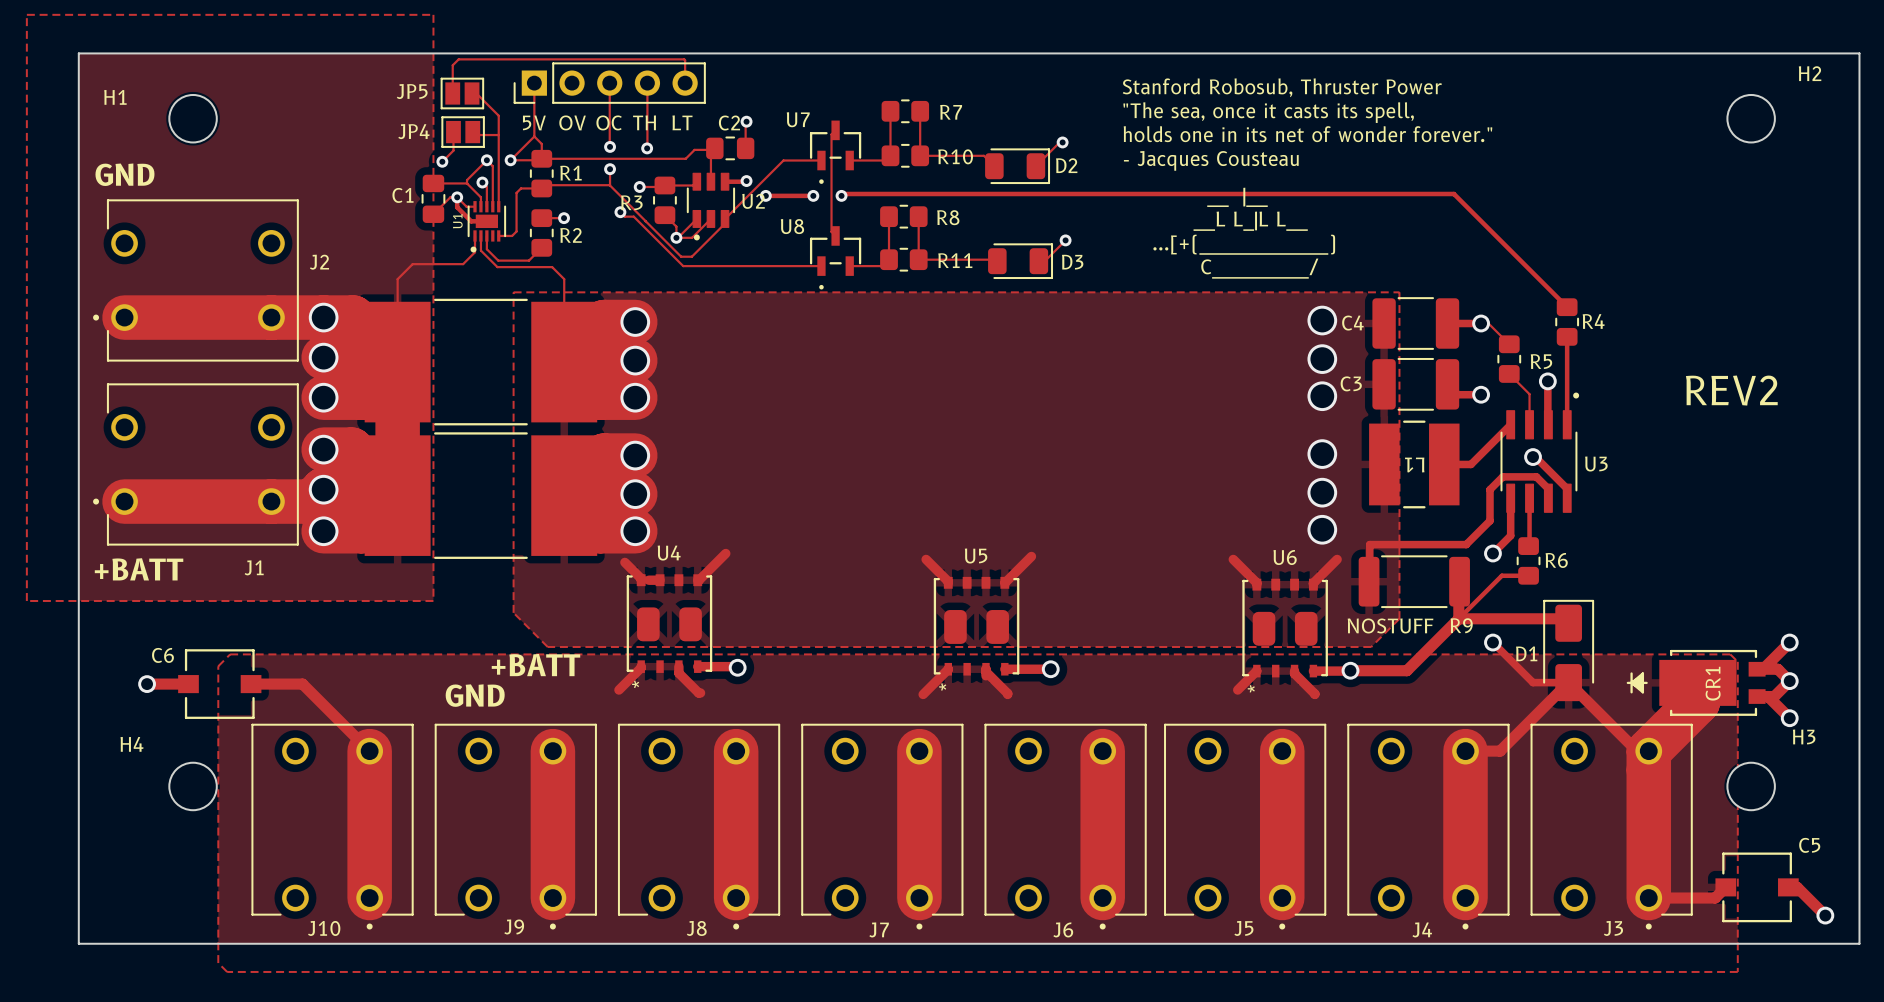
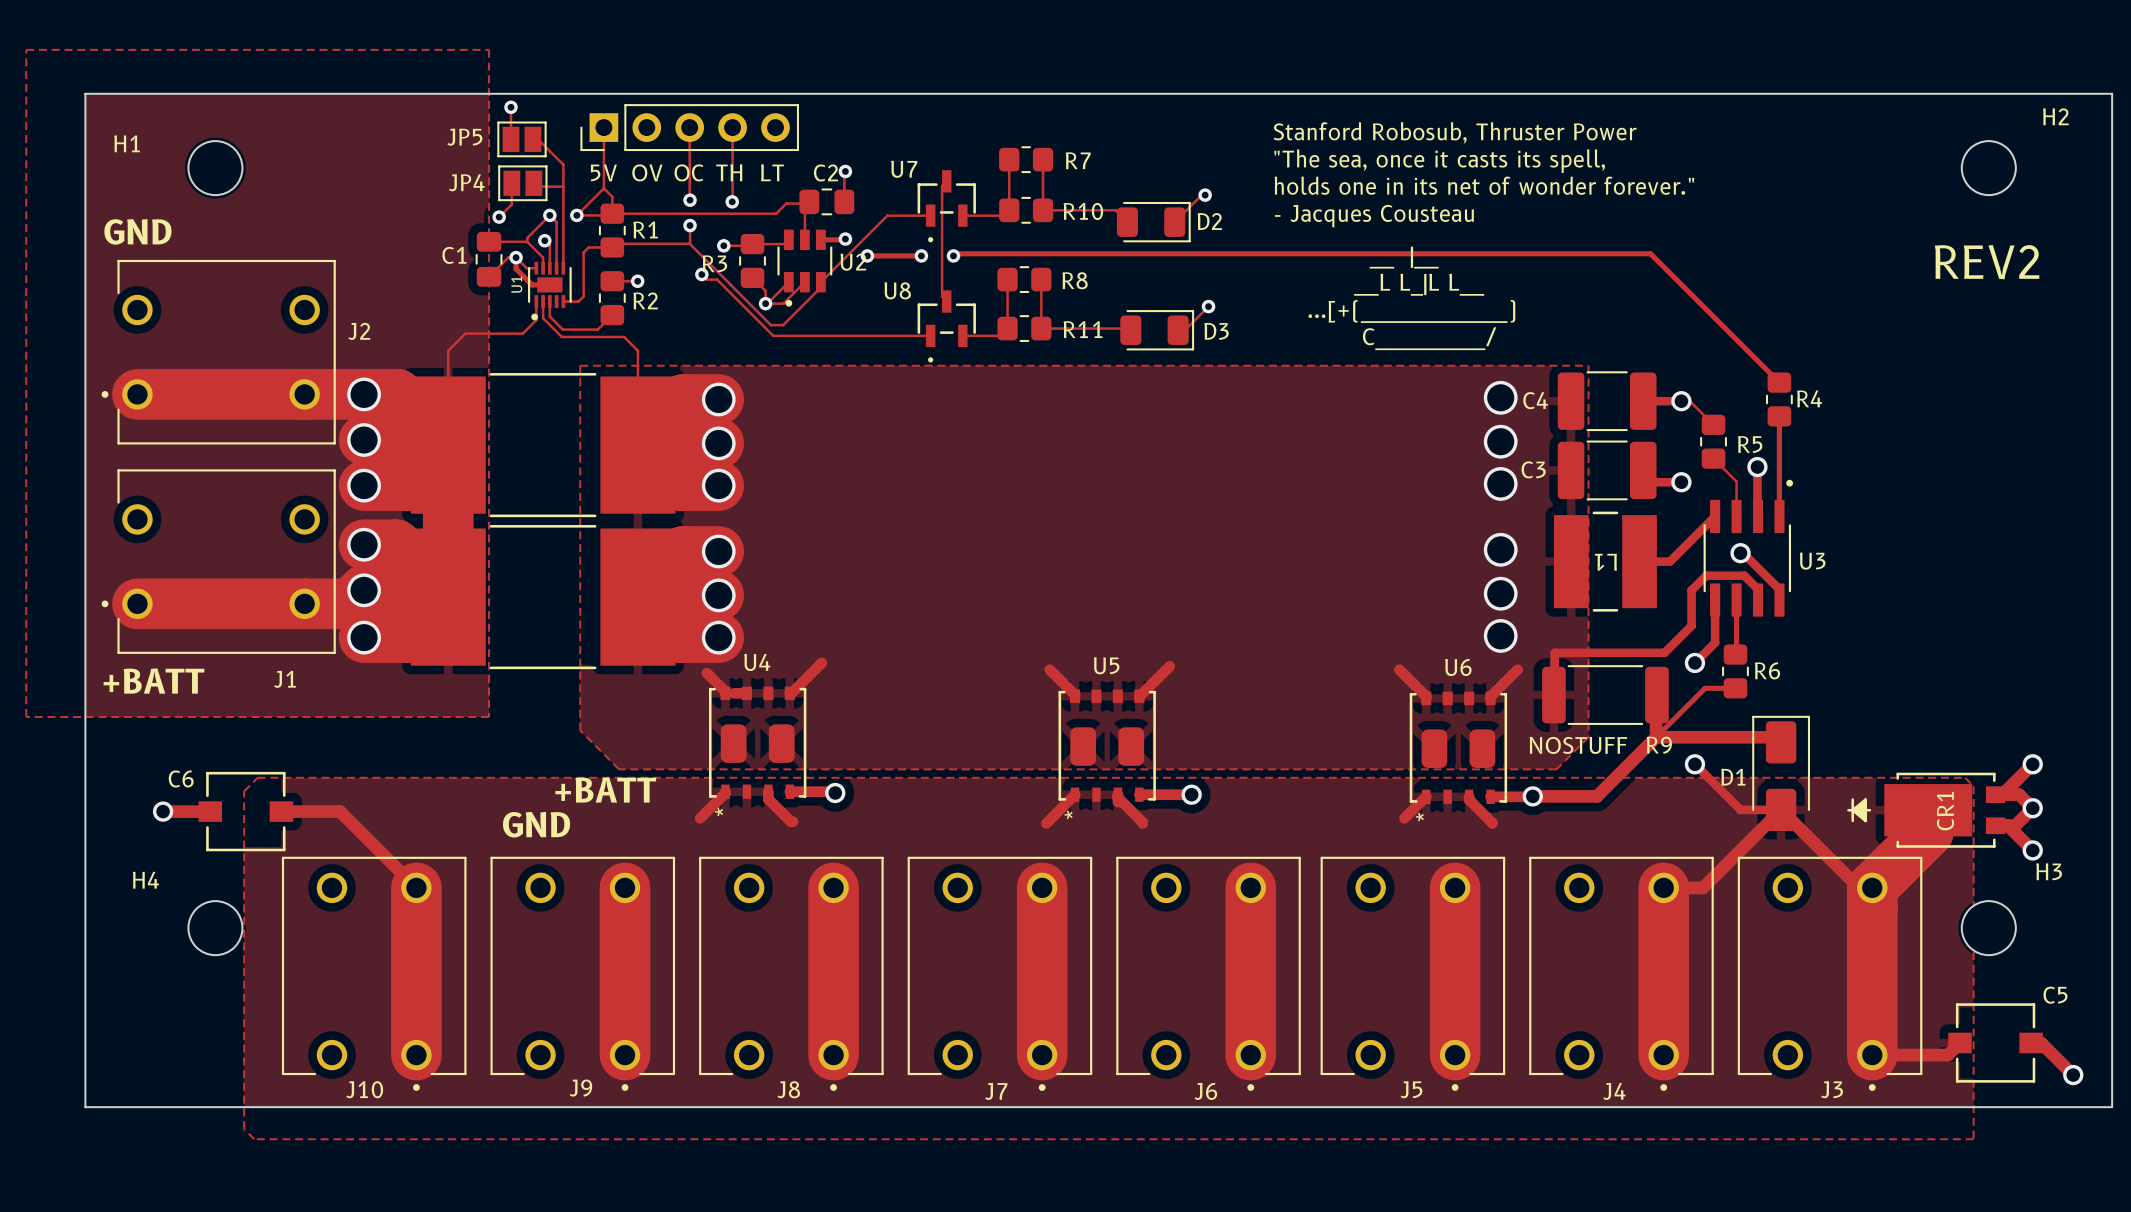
track: (452, 65) (458, 59) (684, 59) (685, 83) -> none
via: none -> (511, 107)
text position: REV2 (1731, 390) -> REV2 (1987, 262)

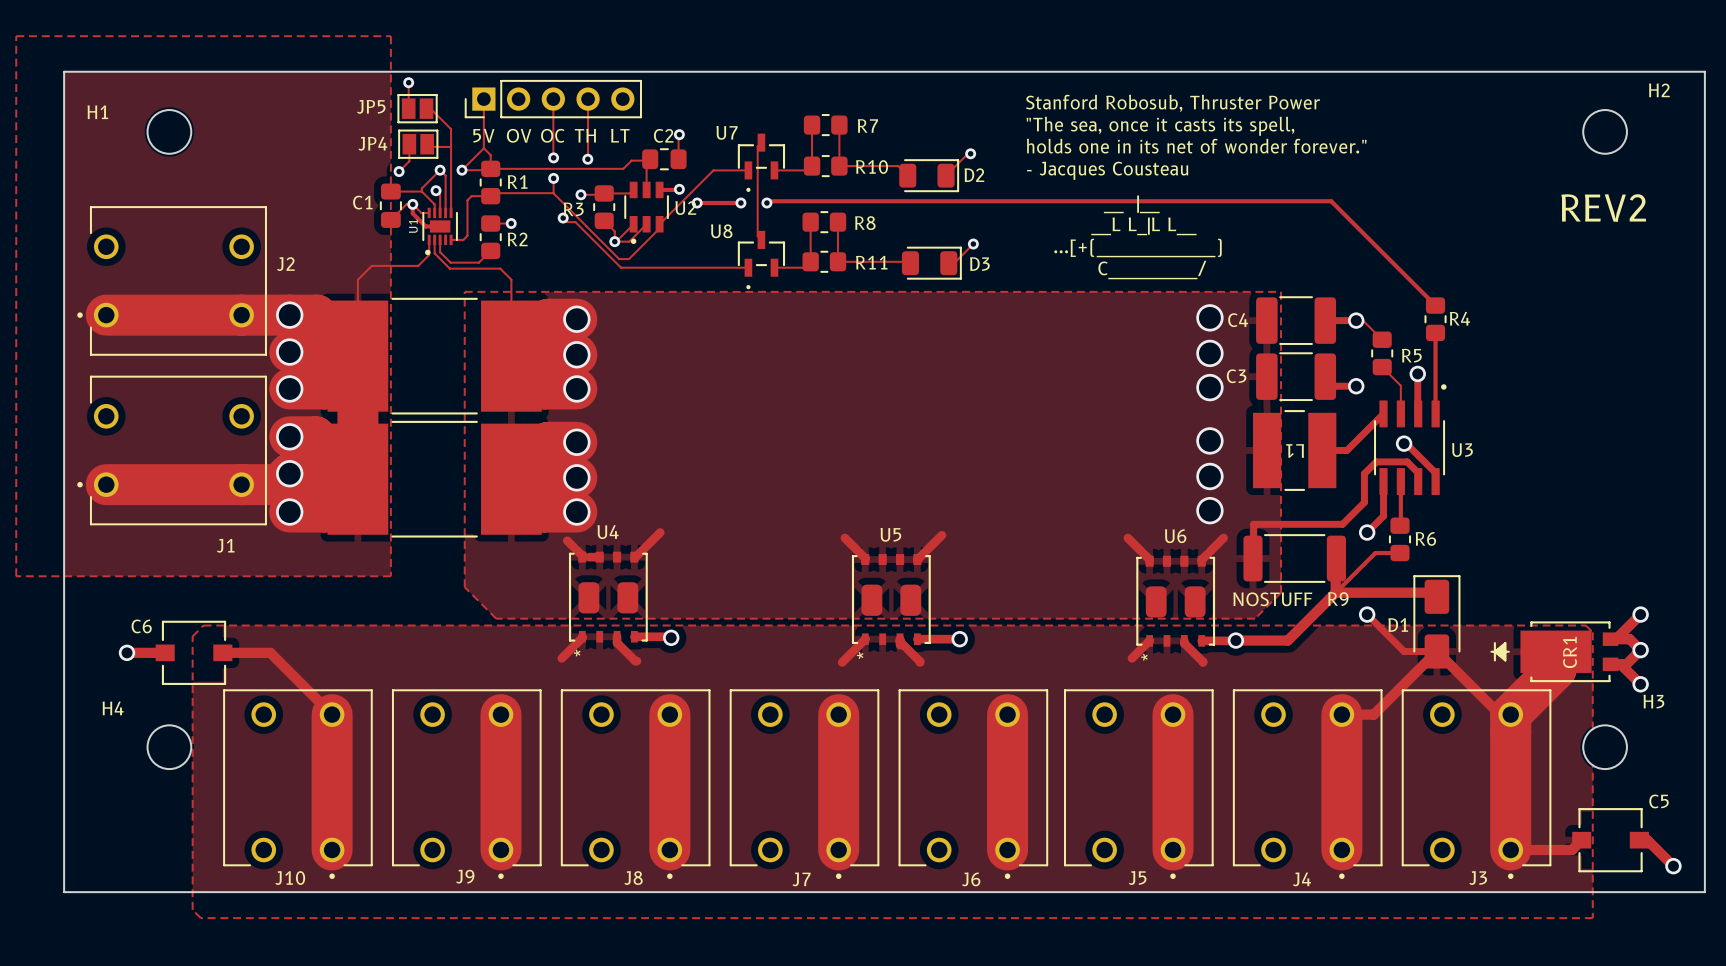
text: GND (137, 231) -> none
text: +BATT (153, 680) -> none
text: +BATT (605, 789) -> none
text: GND (536, 824) -> none

